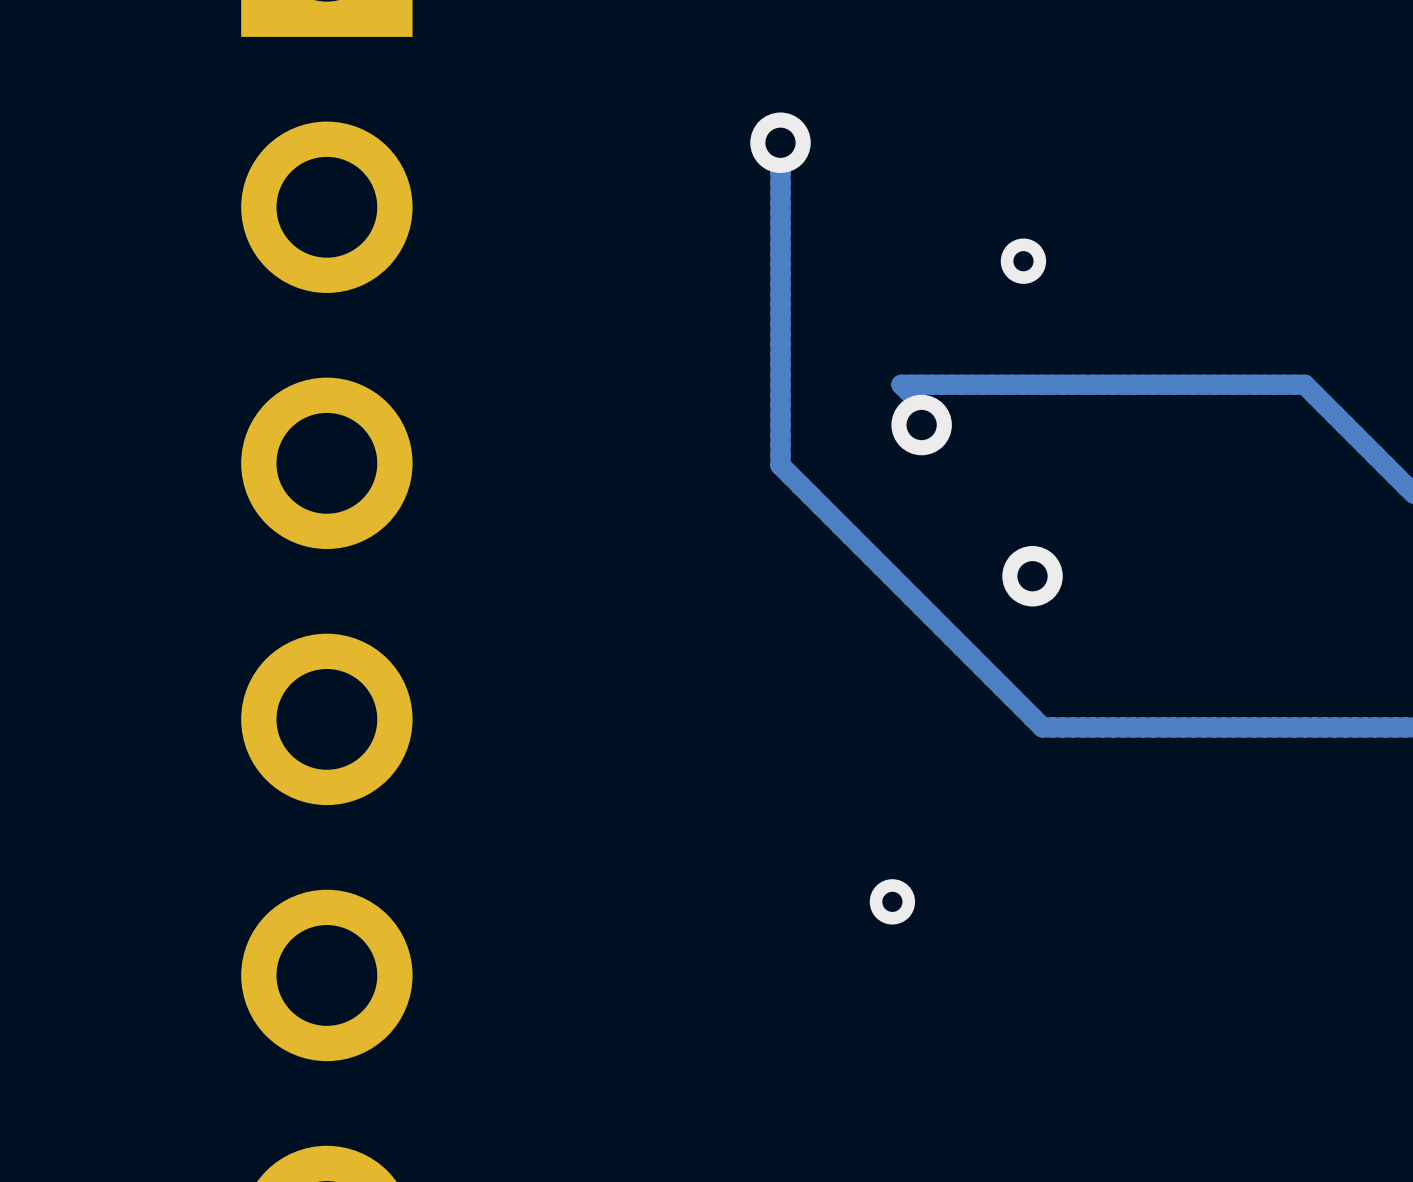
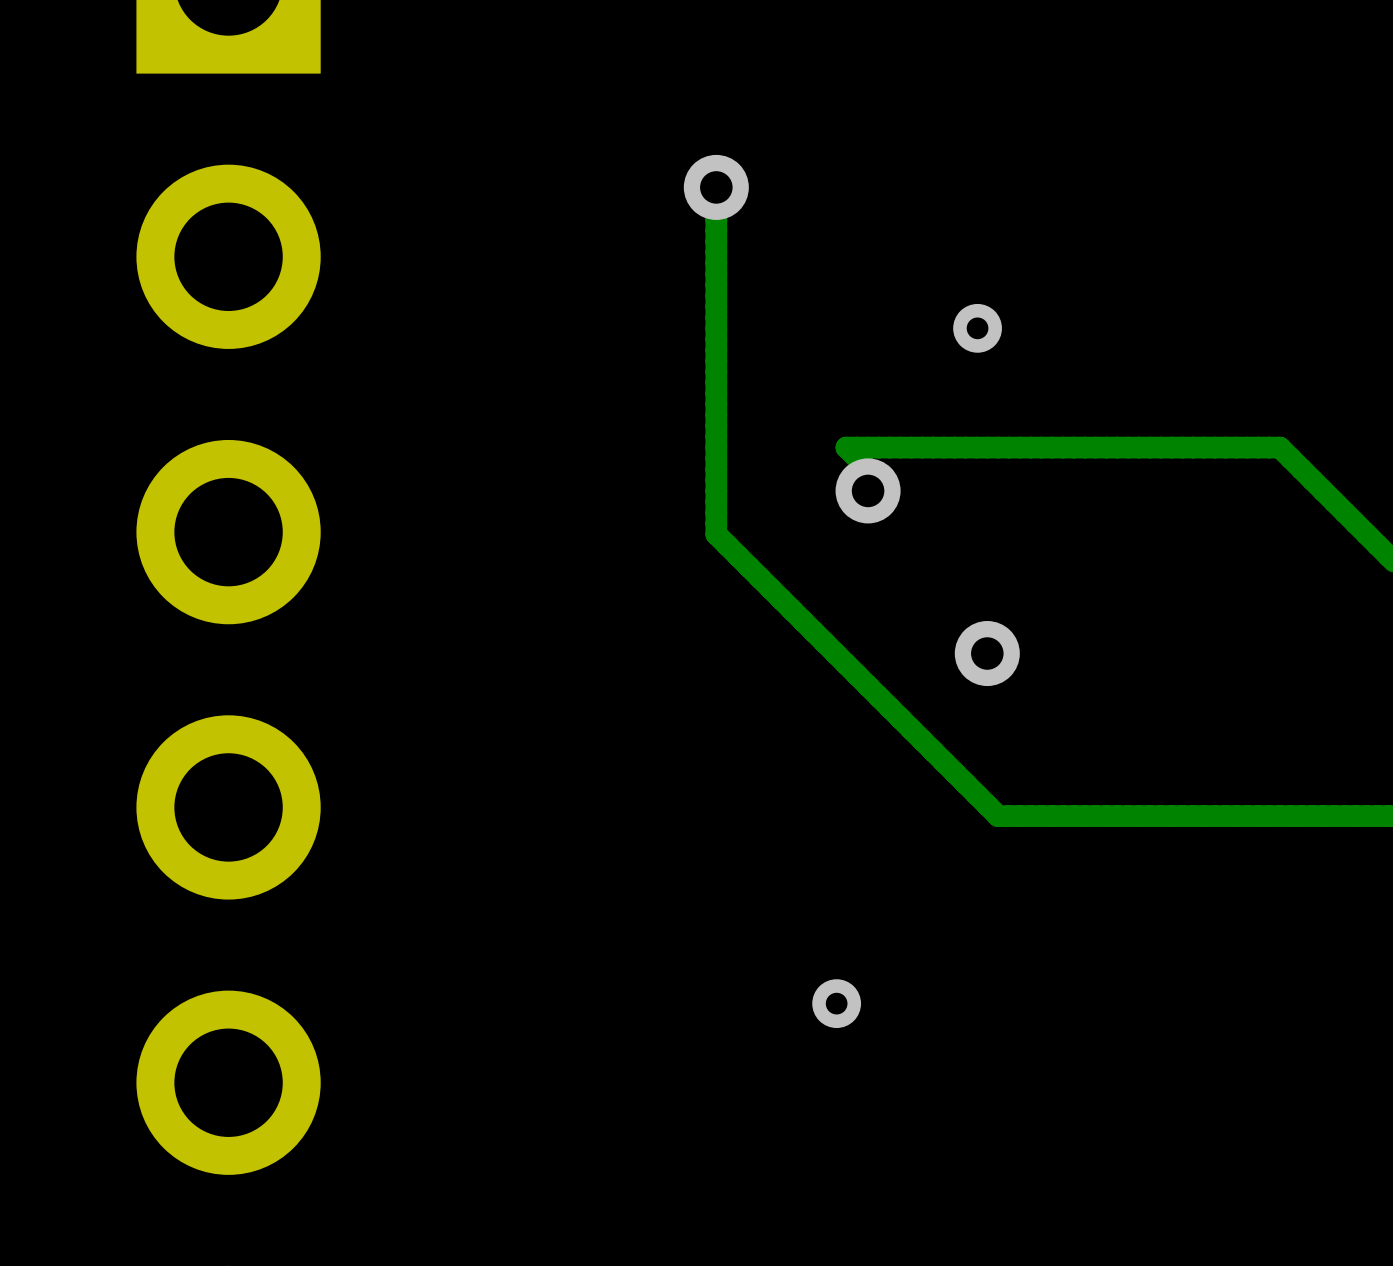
via position: (1023, 261) -> (977, 328)

